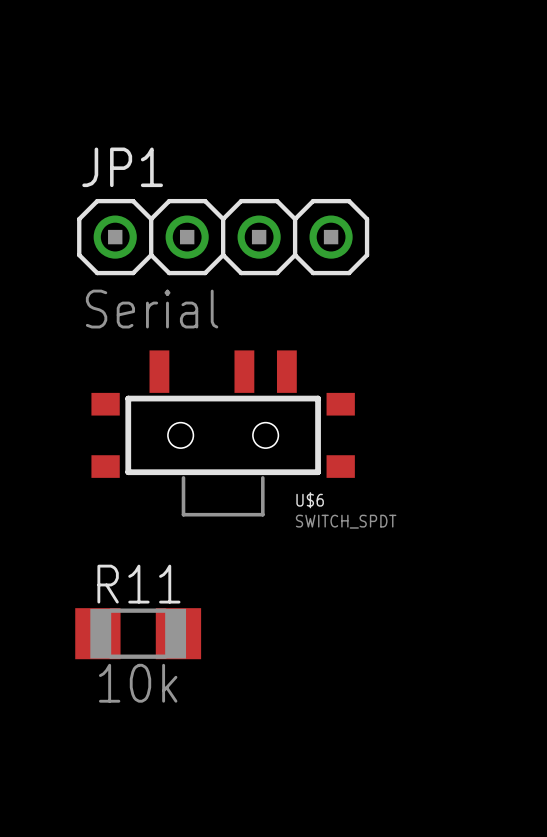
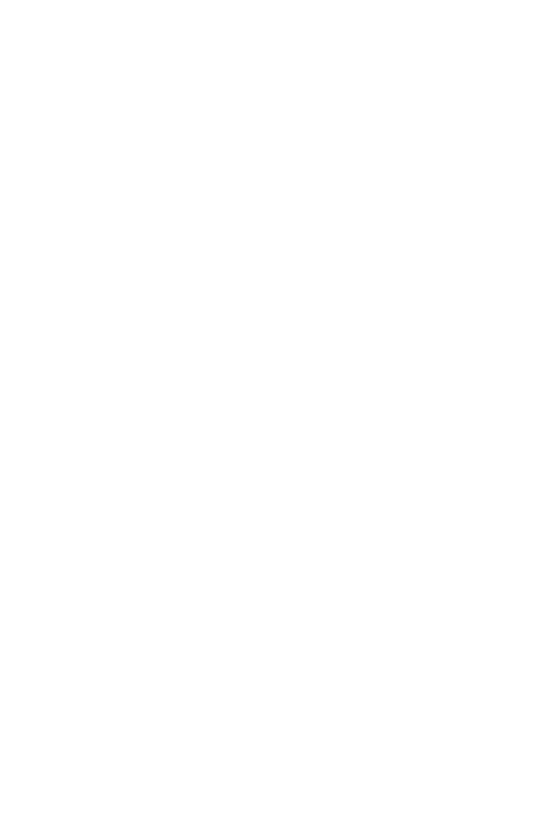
JP1: Serial (223, 237) -> none
U$6: SWITCH_SPDT (223, 433) -> none
R11: 10k (138, 633) -> none

